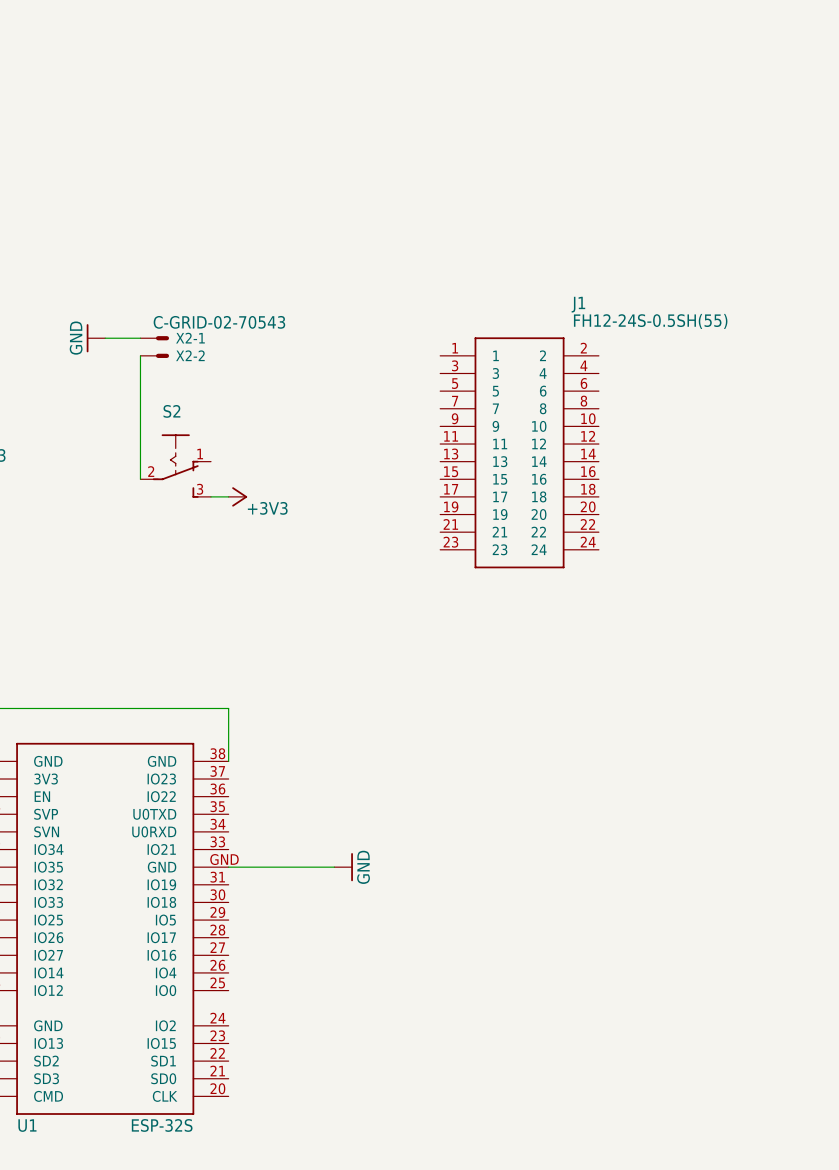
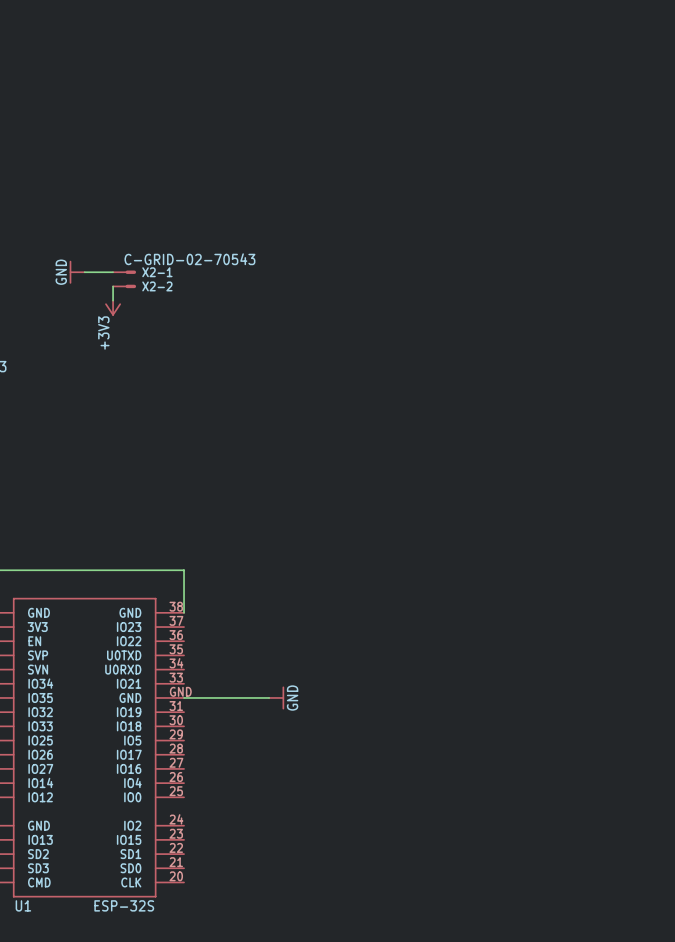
wire: (140, 373) (140, 479) -> none
J1: FH12-24S-0.5SH(55) (519, 452) -> none
S2: (175, 466) -> none
wire: (211, 496) (228, 496) -> none
power symbol position: +3V3 (237, 496) -> +3V3 (113, 308)
power symbol rotation: 0° (239, 496) -> 90° clockwise (113, 309)

